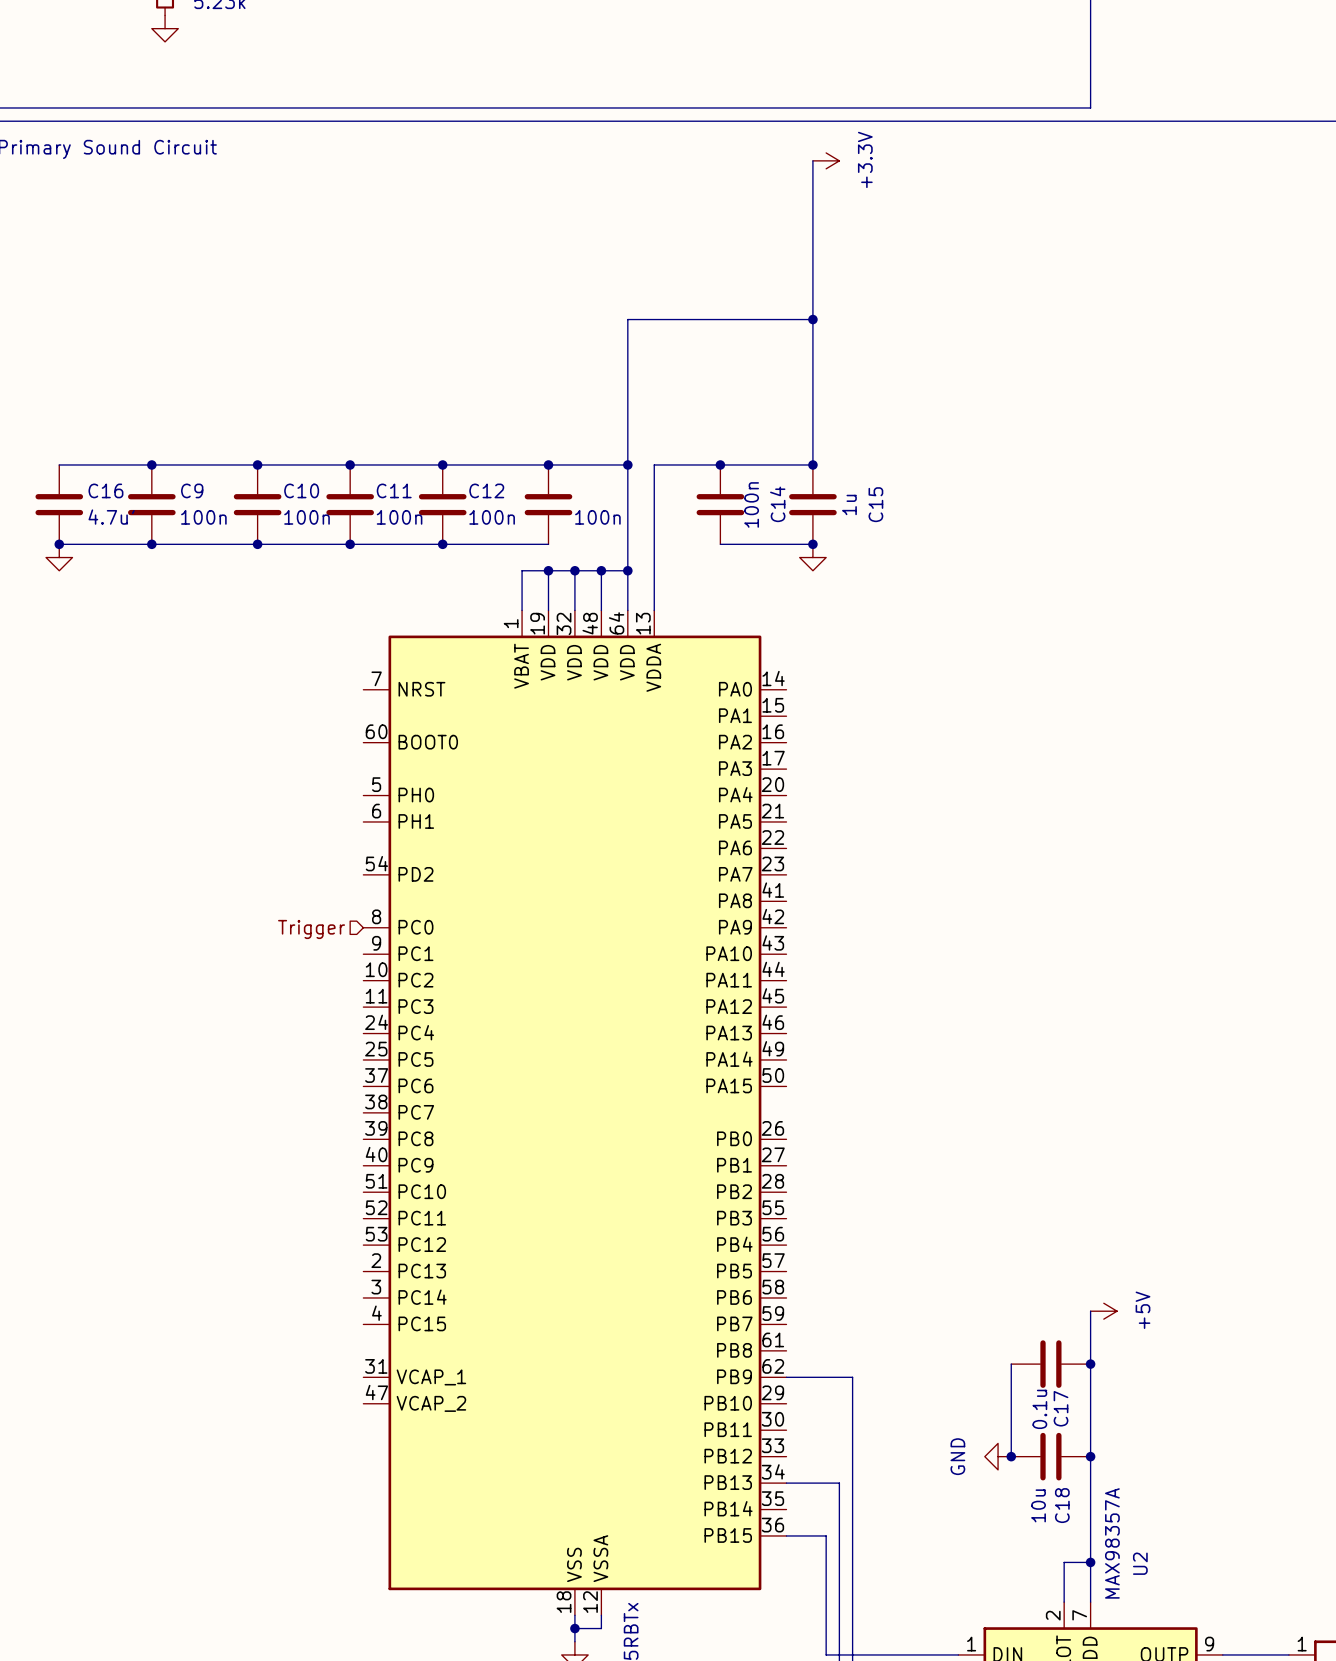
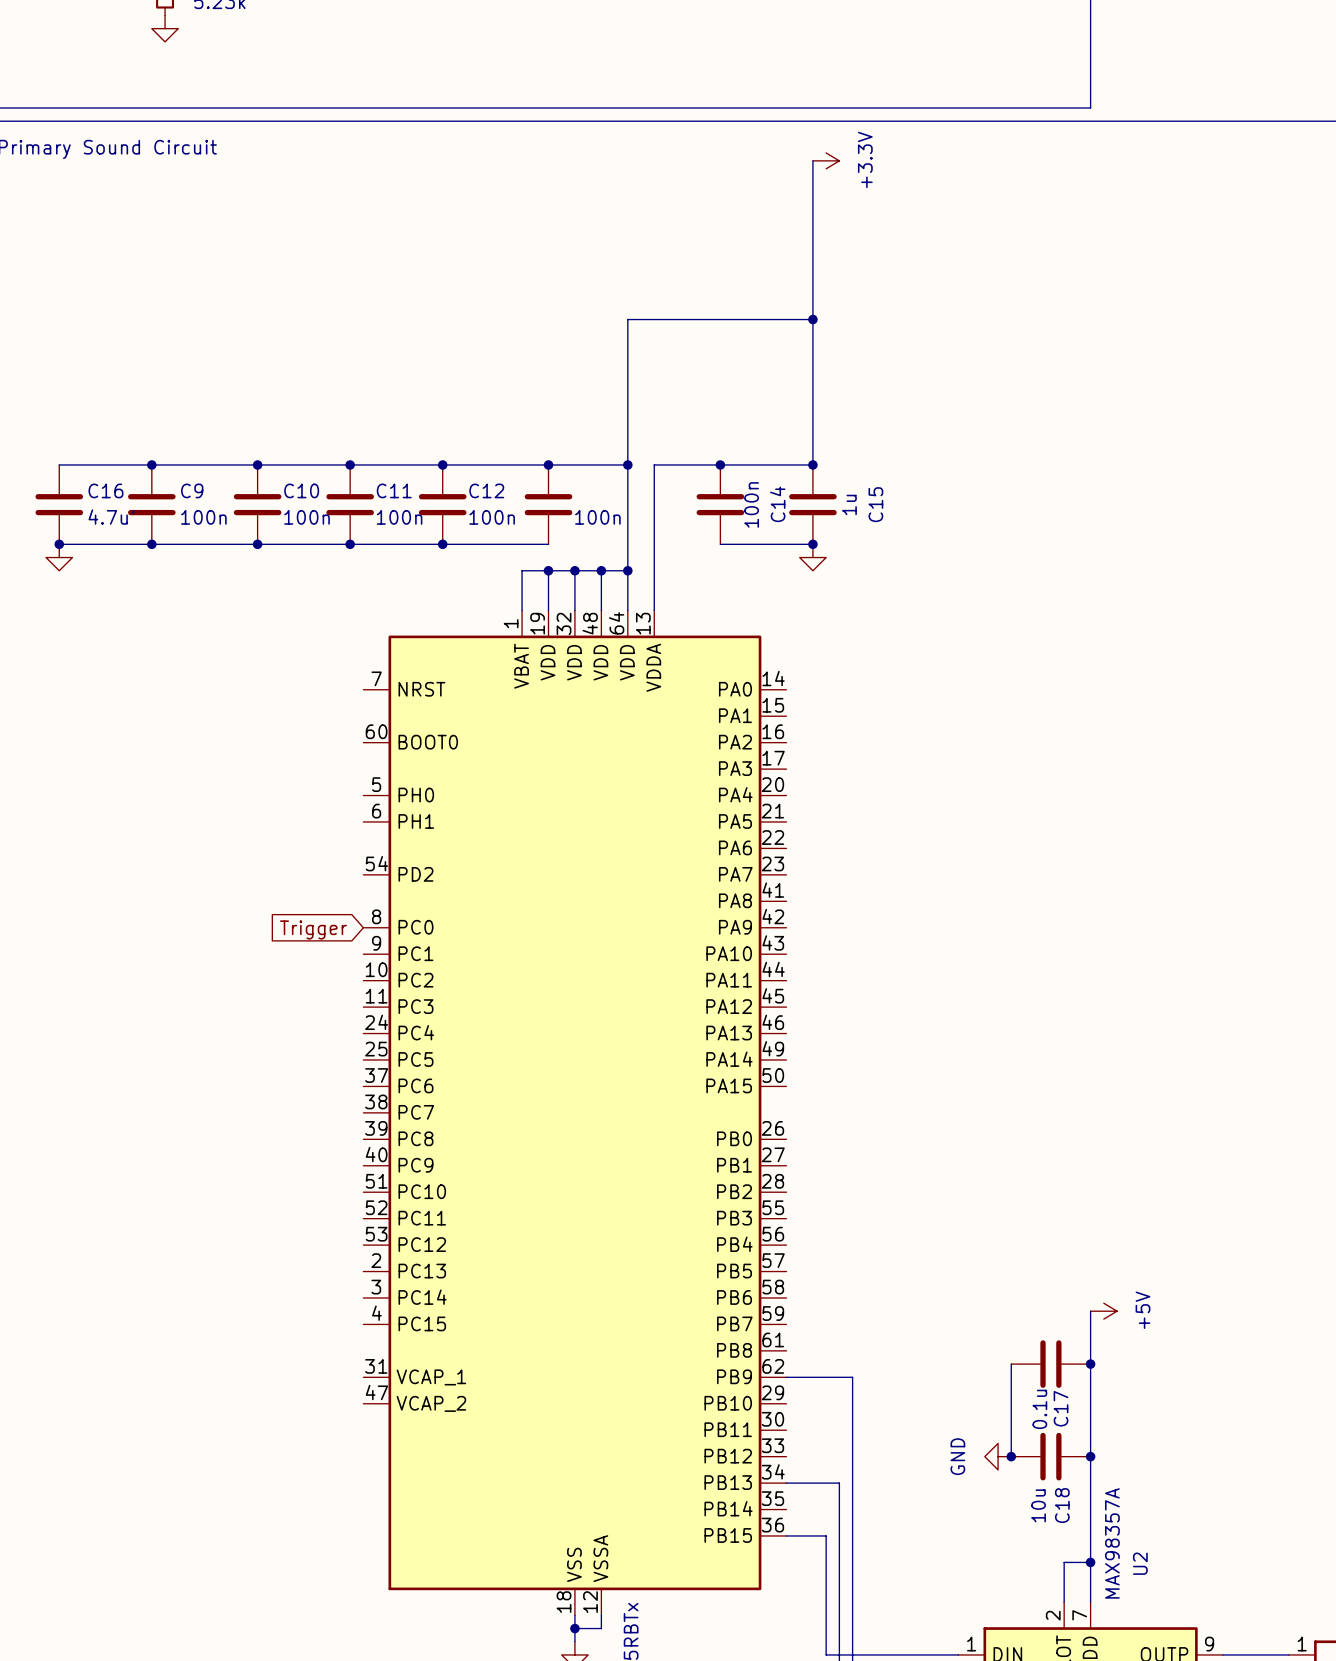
hierarchical label: Trigger (311, 929) -> none
global label: none -> Trigger (313, 929)

